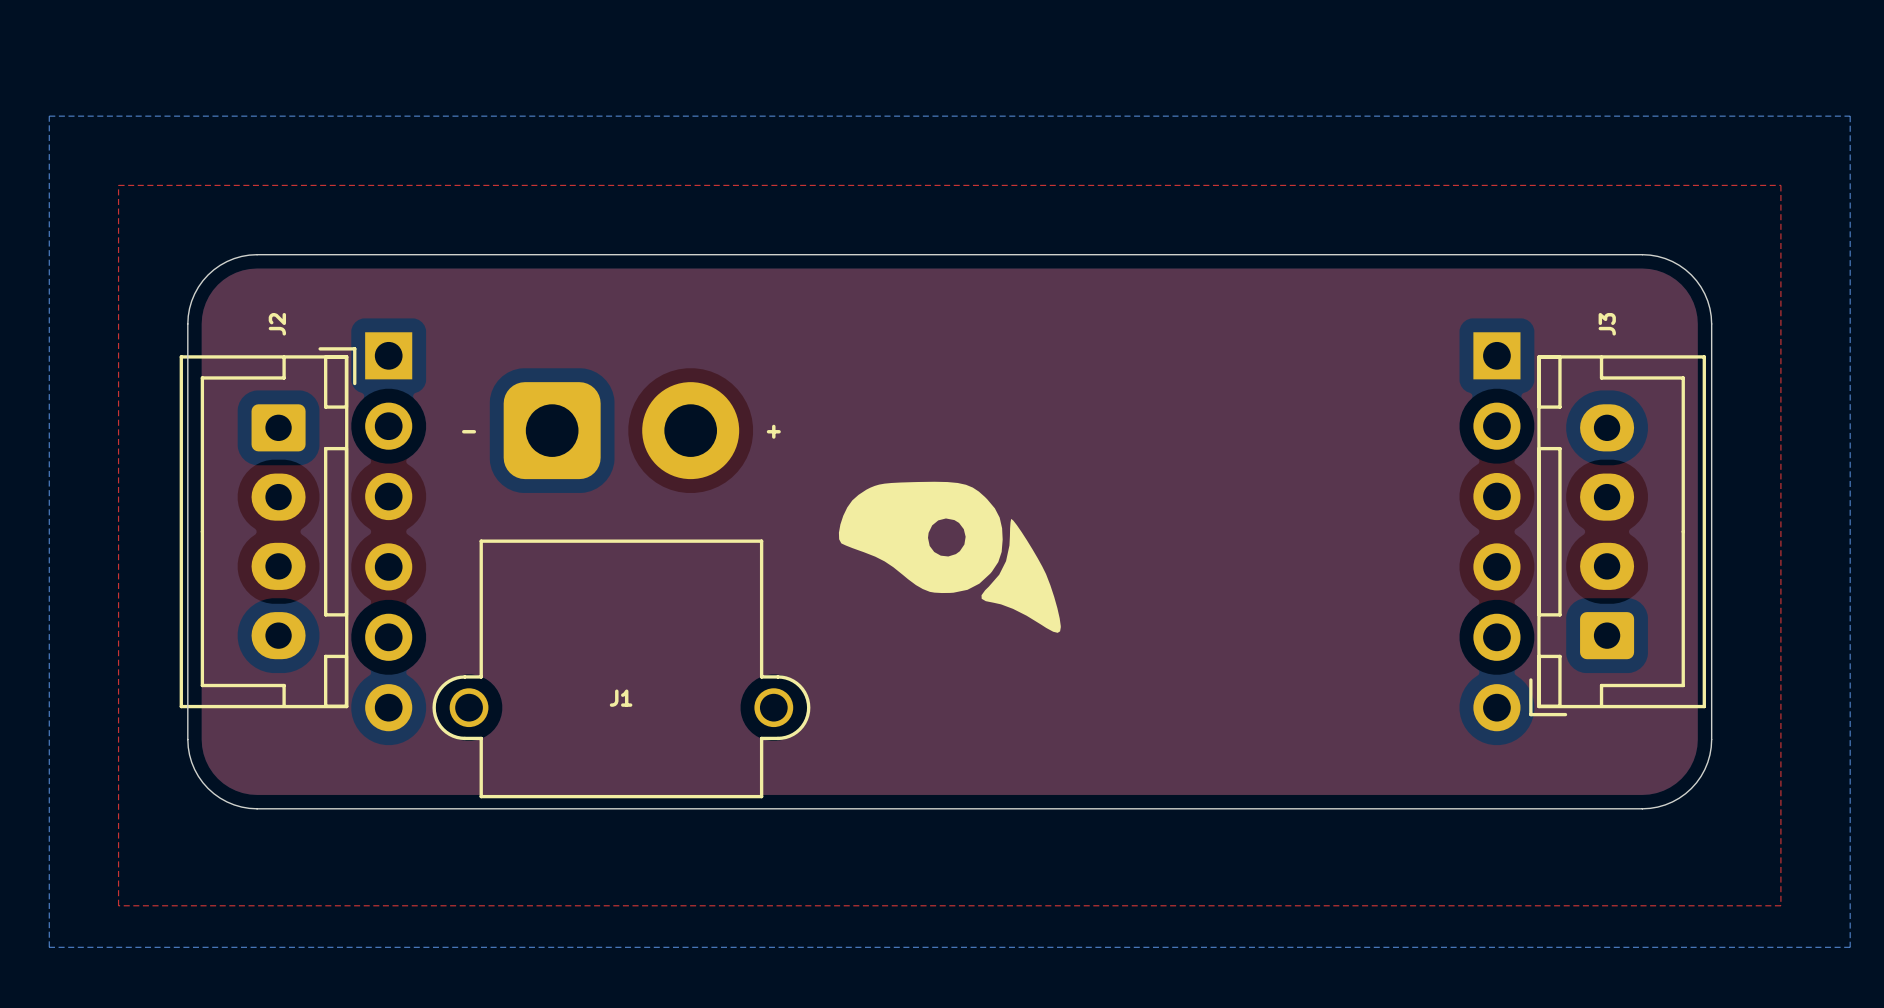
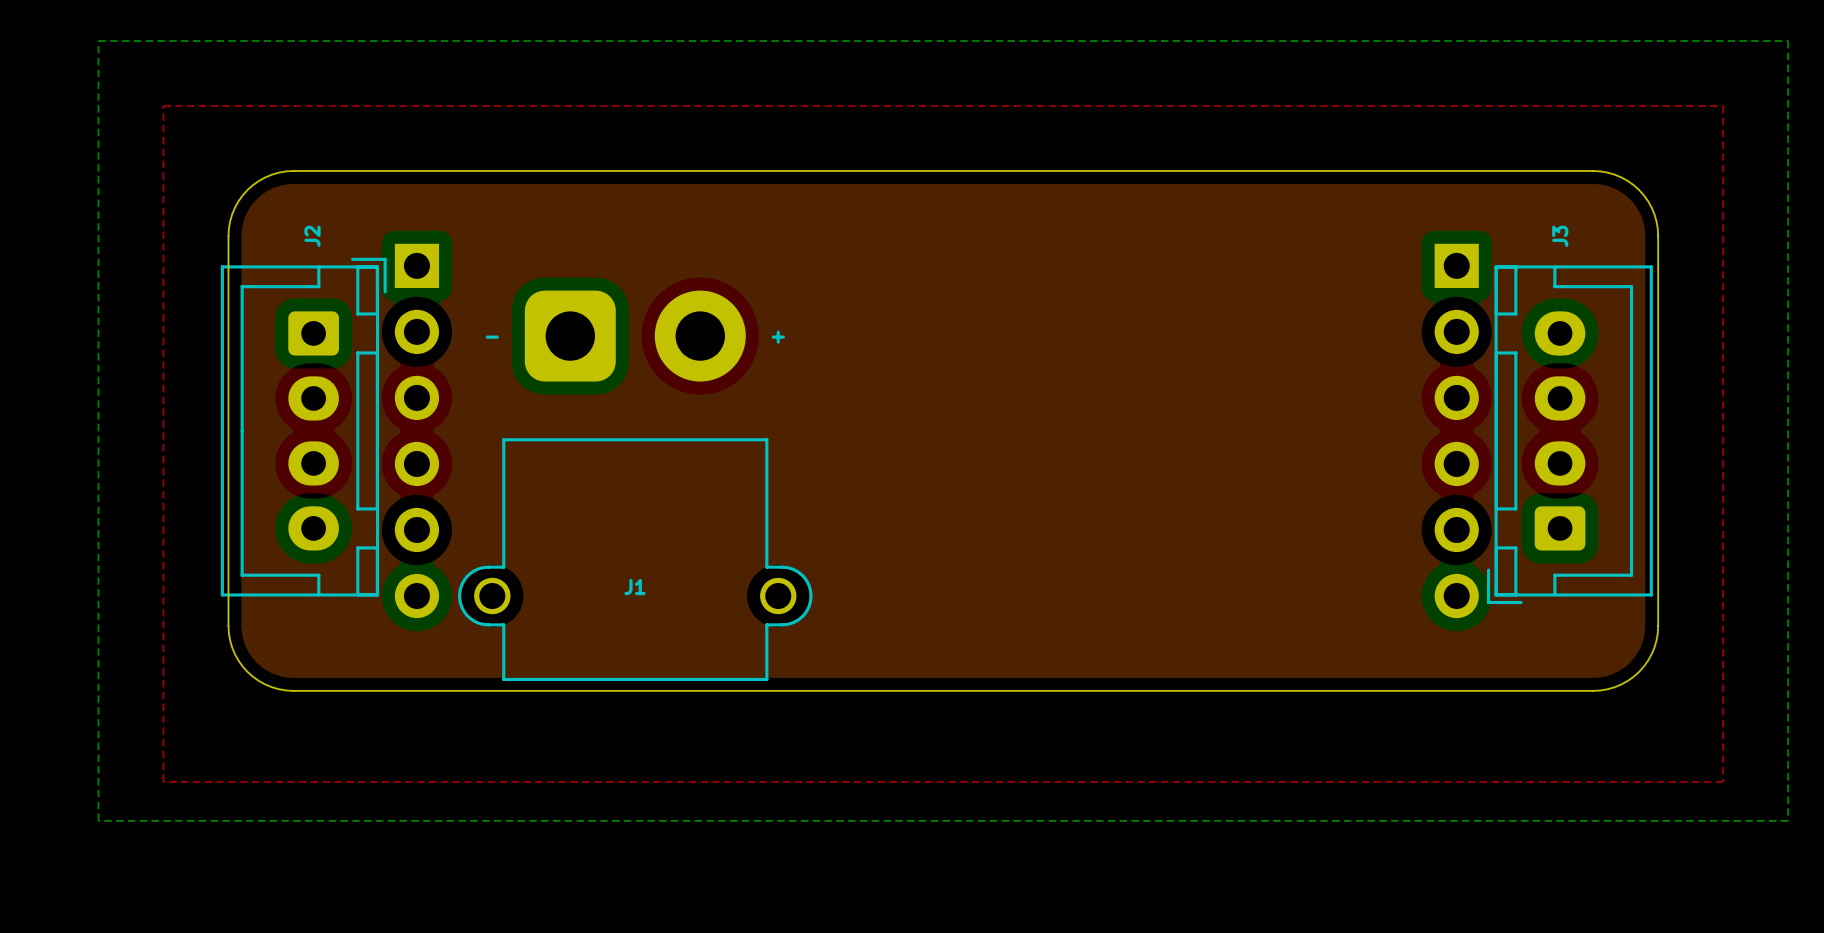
drawing: [838, 481, 1061, 633] -> none

